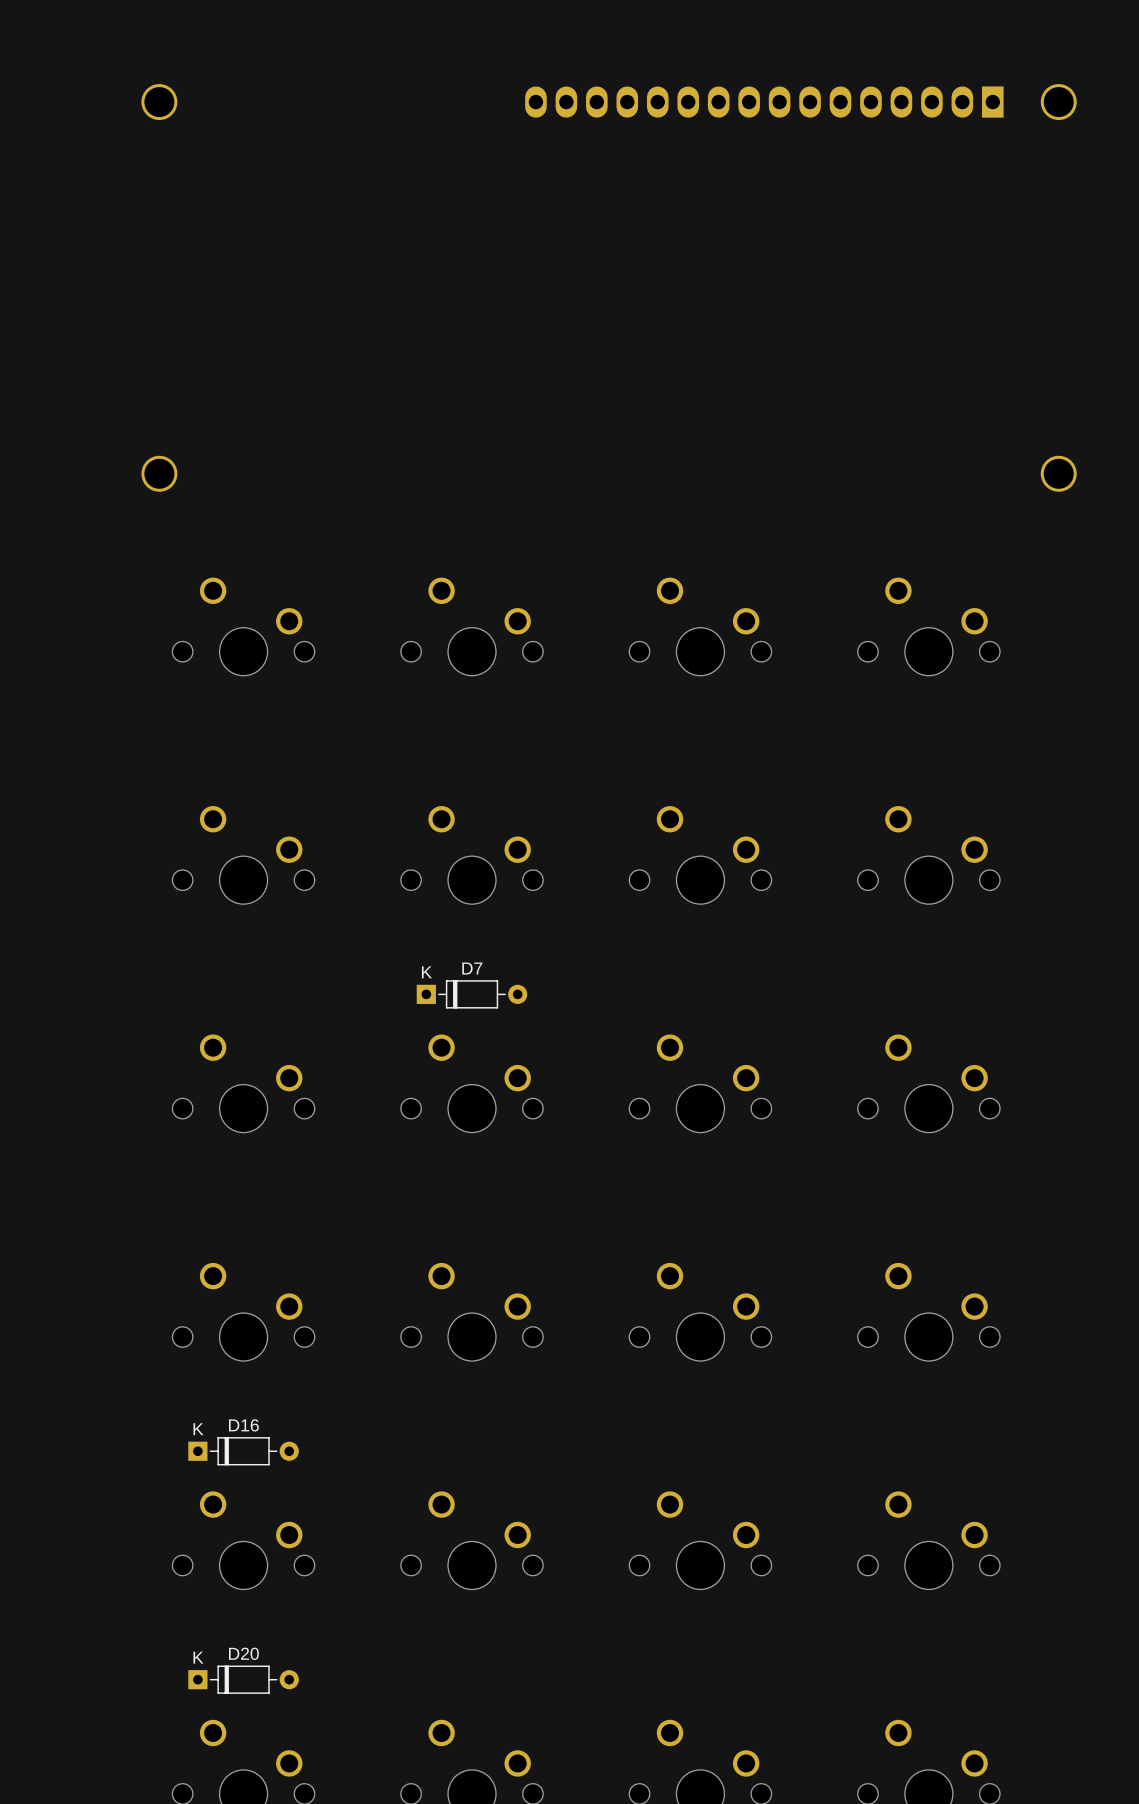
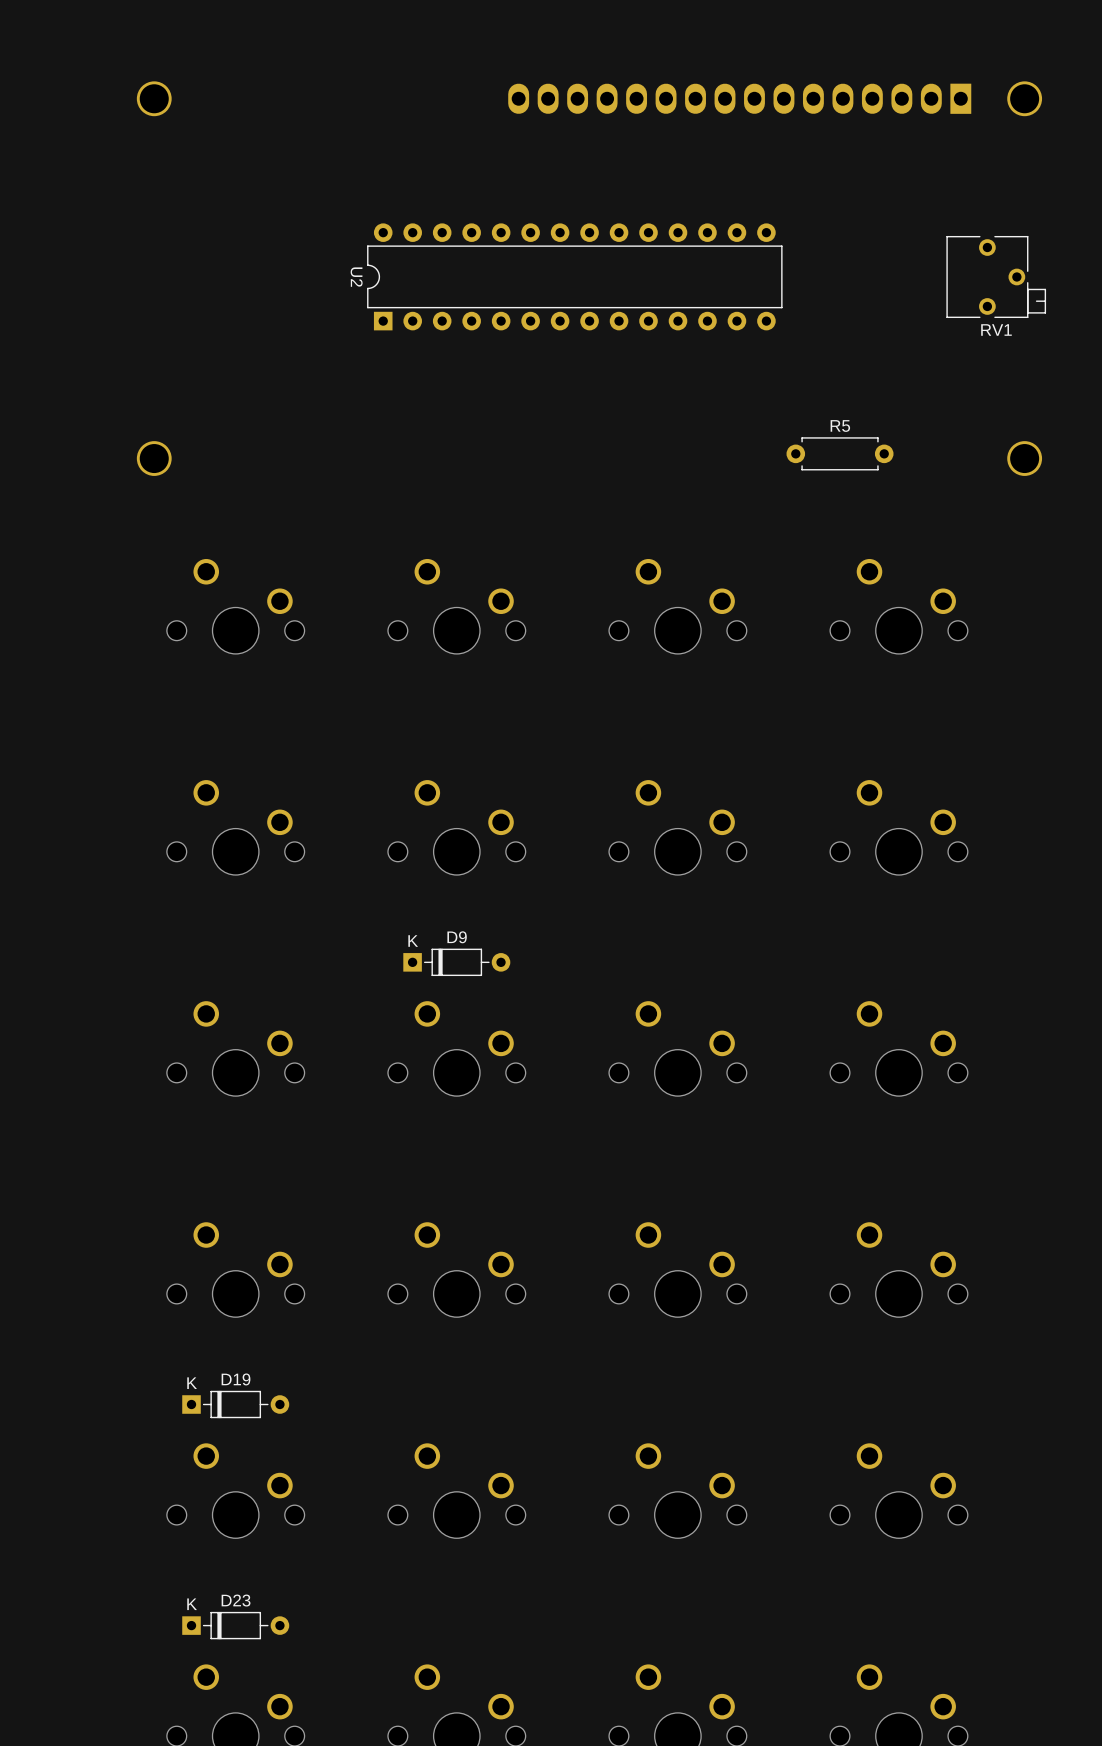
U2: none -> (574, 276)
RV1: none -> (996, 276)
R5: none -> (840, 453)
D7 name: D7 (472, 968) -> D9 (457, 937)
D16 name: D16 (243, 1425) -> D19 (236, 1379)
D20 name: D20 (243, 1653) -> D23 (236, 1600)

